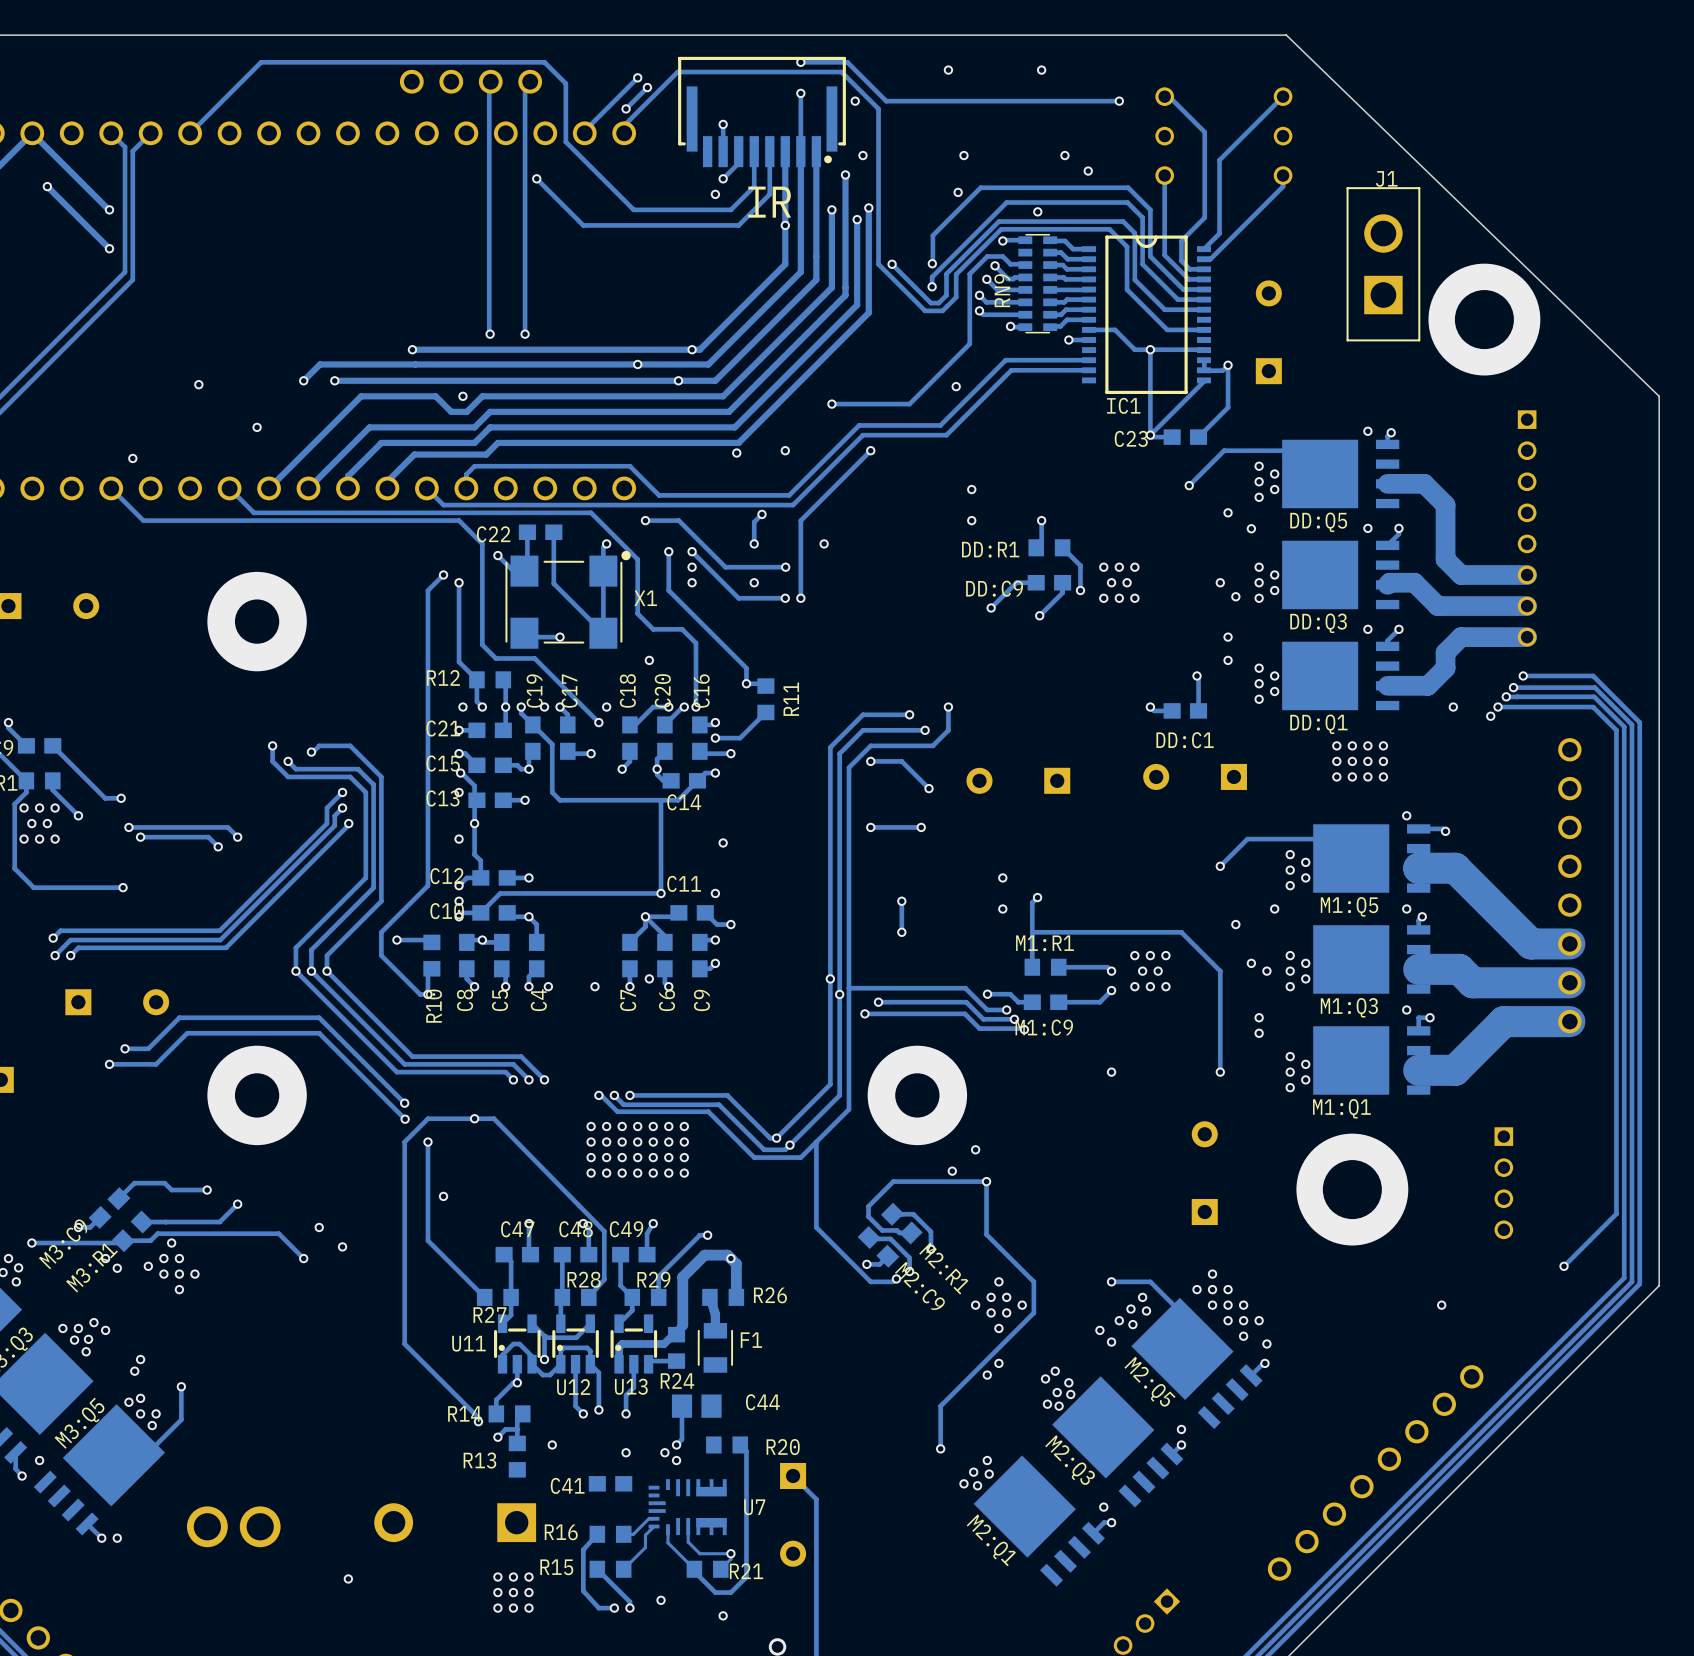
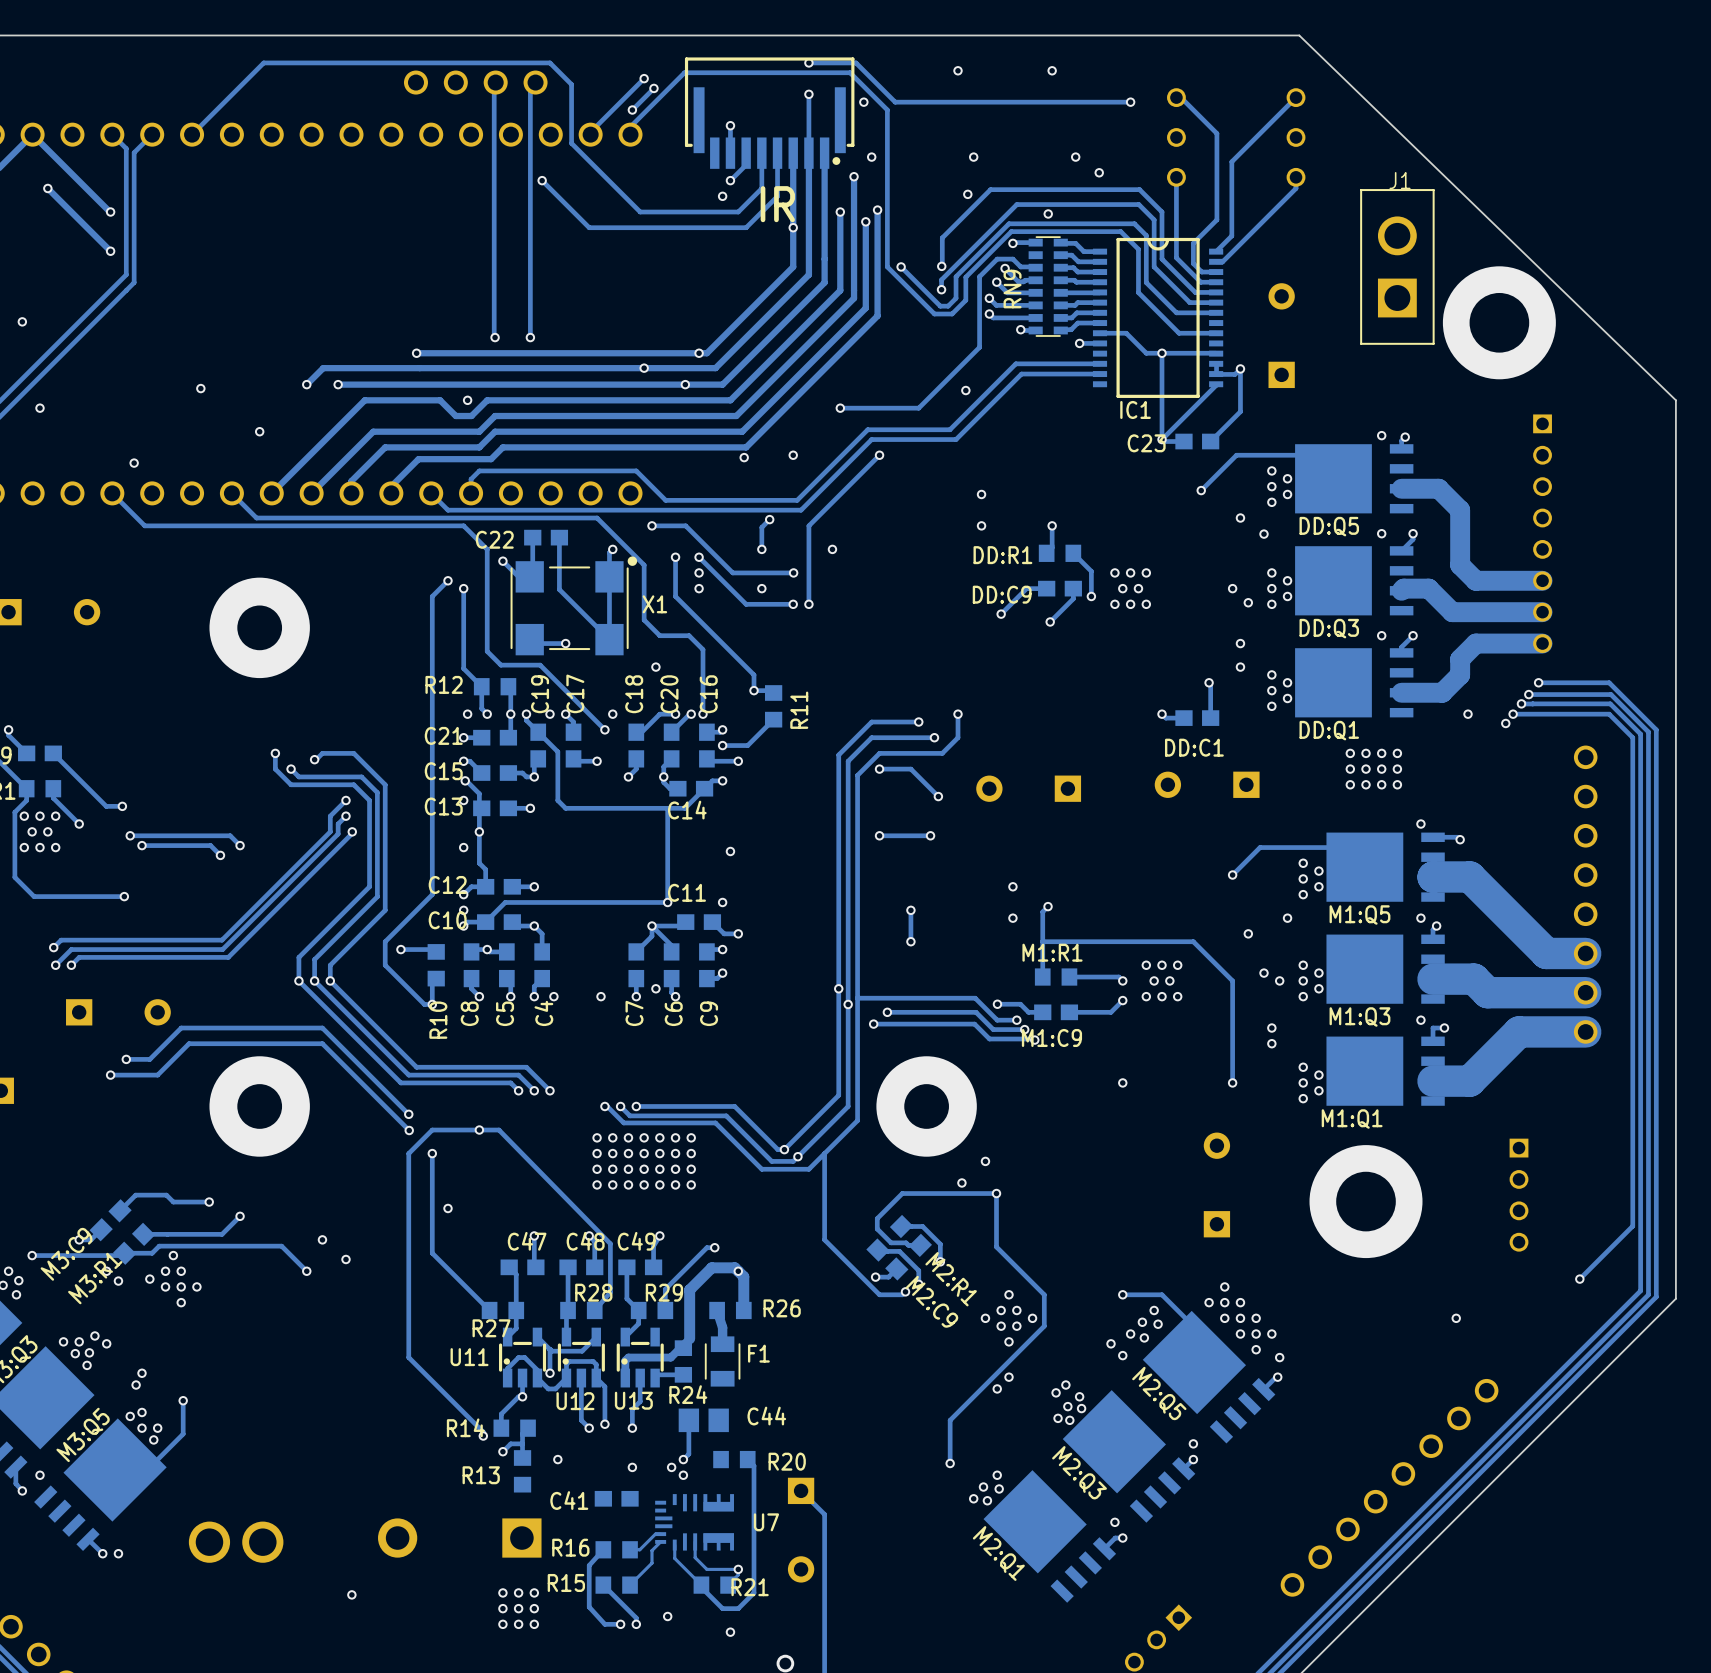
via: none -> (22, 321)
via: none -> (39, 408)

